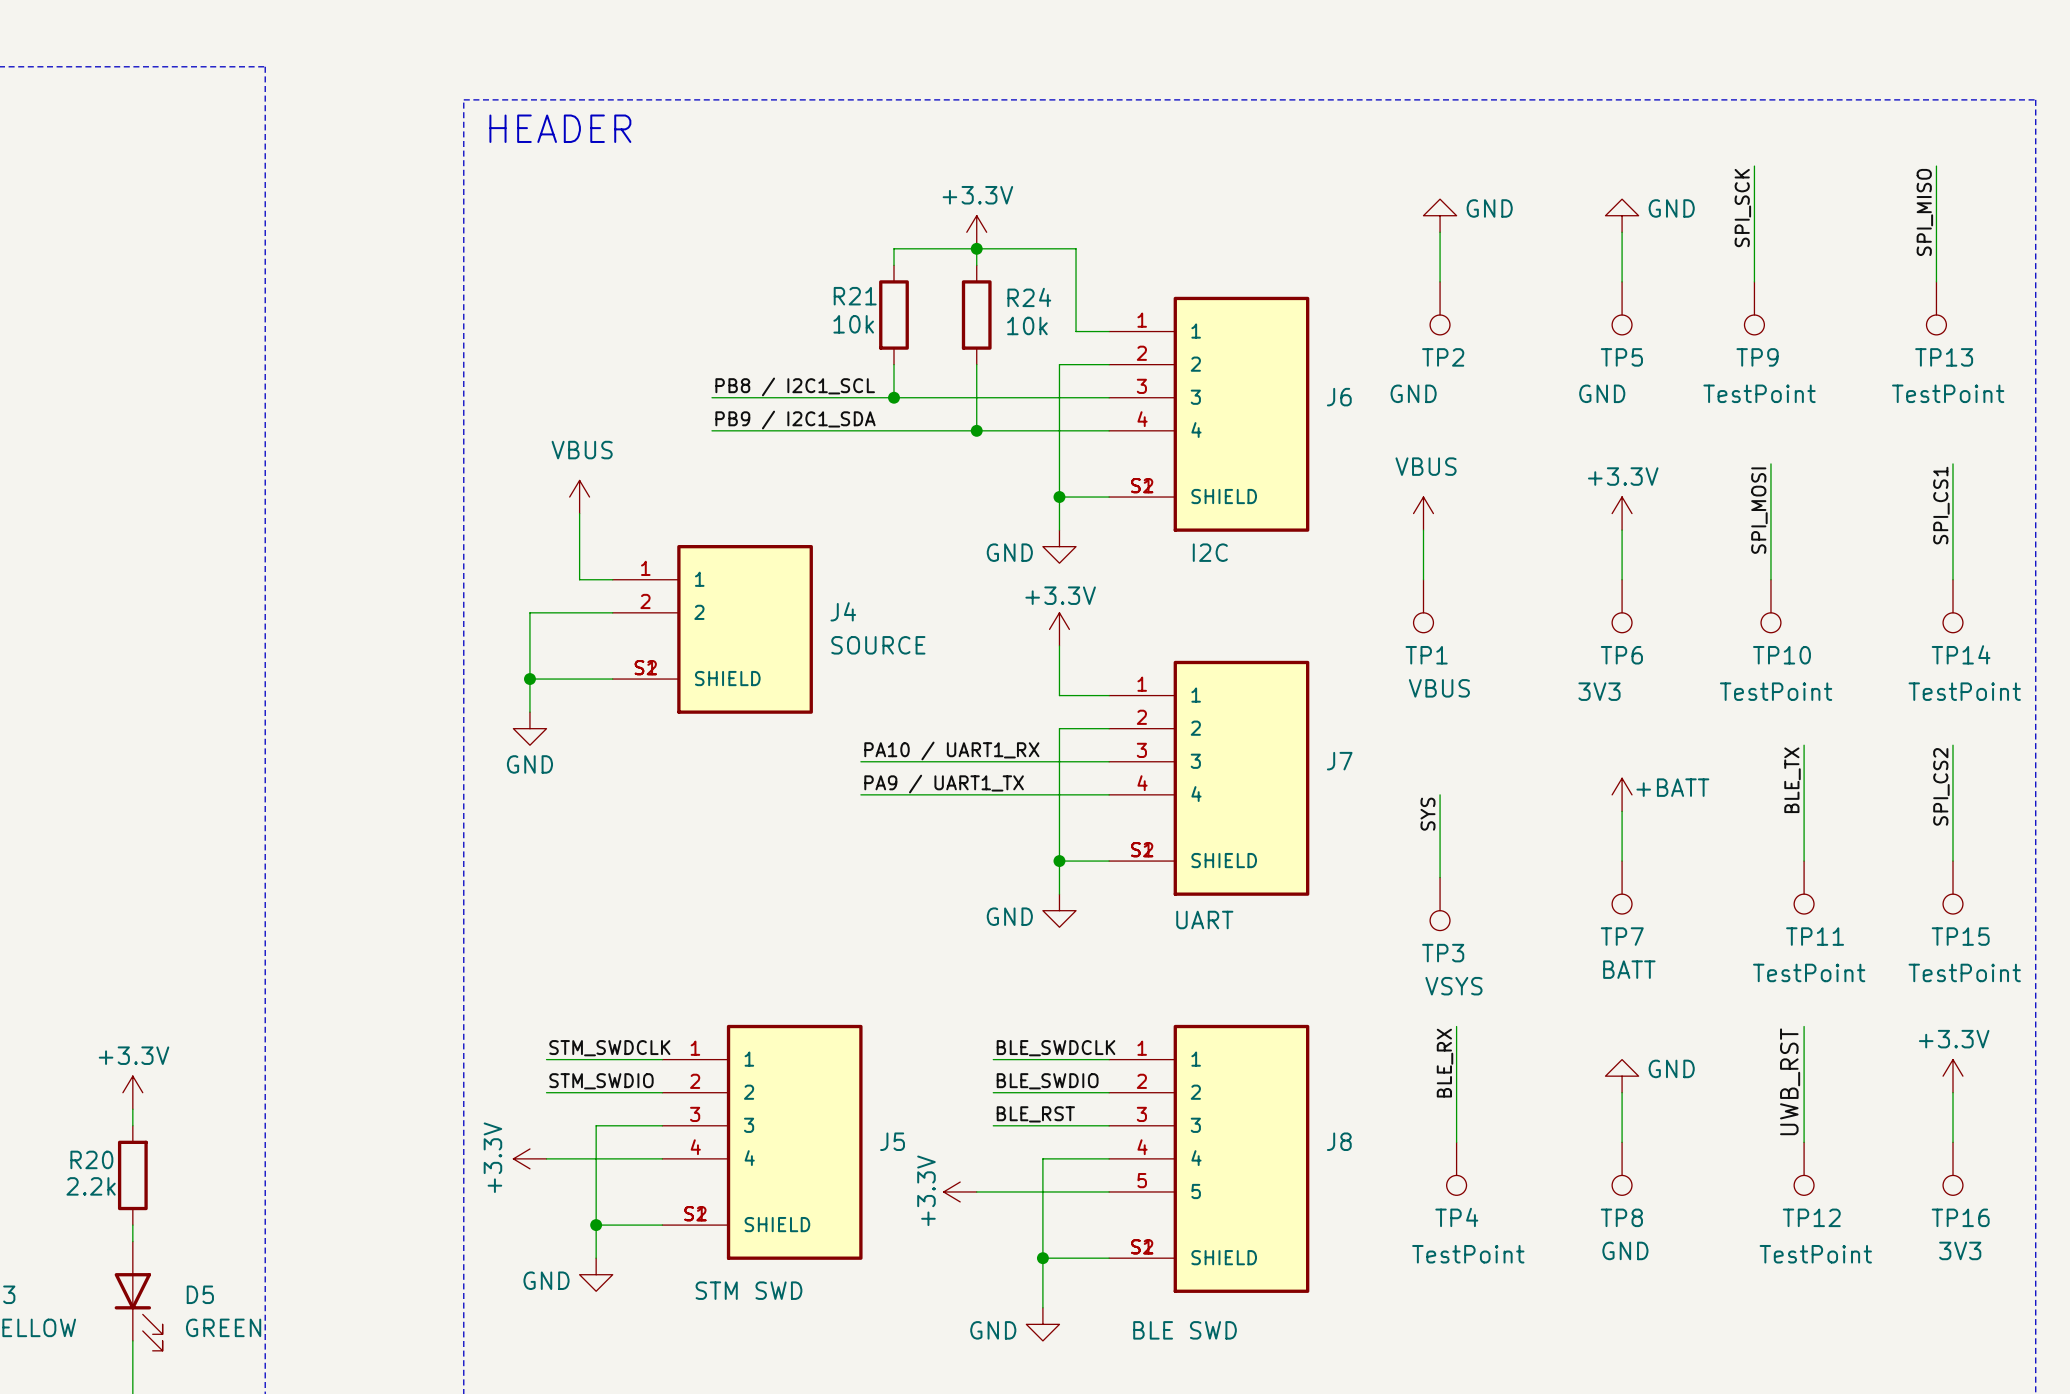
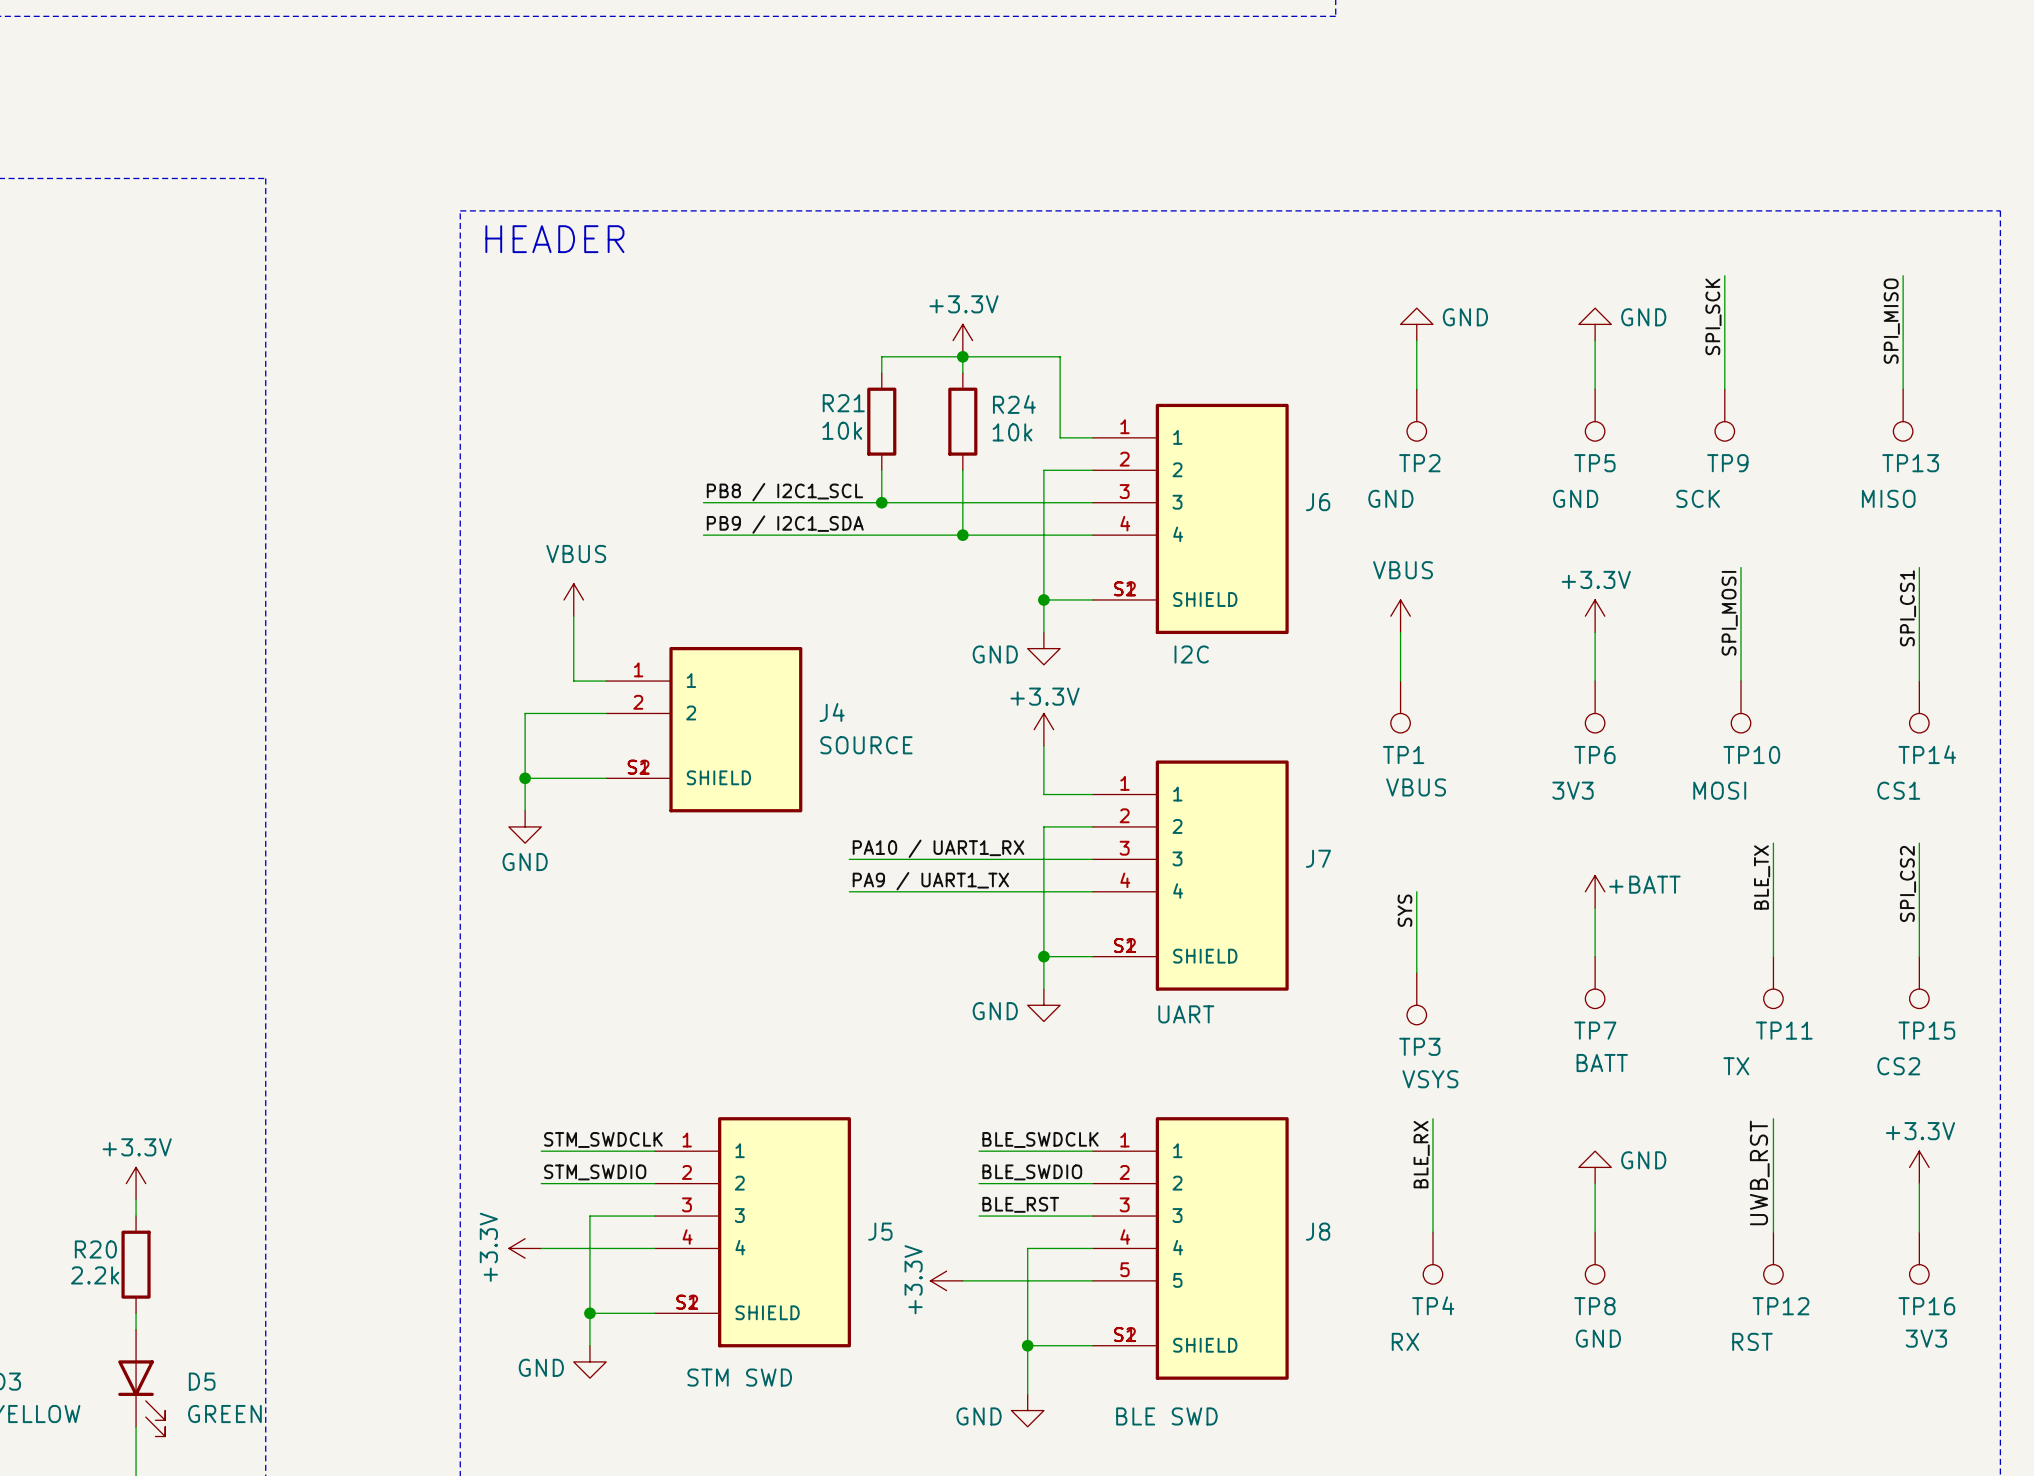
TP9 value: TestPoint (1759, 393) -> SCK (1698, 498)
TP13 value: TestPoint (1948, 393) -> MISO (1888, 498)
TP10 value: TestPoint (1776, 691) -> MOSI (1719, 790)
TP14 value: TestPoint (1964, 691) -> CS1 (1898, 790)
TP11 value: TestPoint (1809, 972) -> TX (1736, 1066)
TP15 value: TestPoint (1964, 972) -> CS2 (1898, 1066)
TP4 value: TestPoint (1468, 1254) -> RX (1405, 1341)
TP12 value: TestPoint (1815, 1254) -> RST (1752, 1341)

